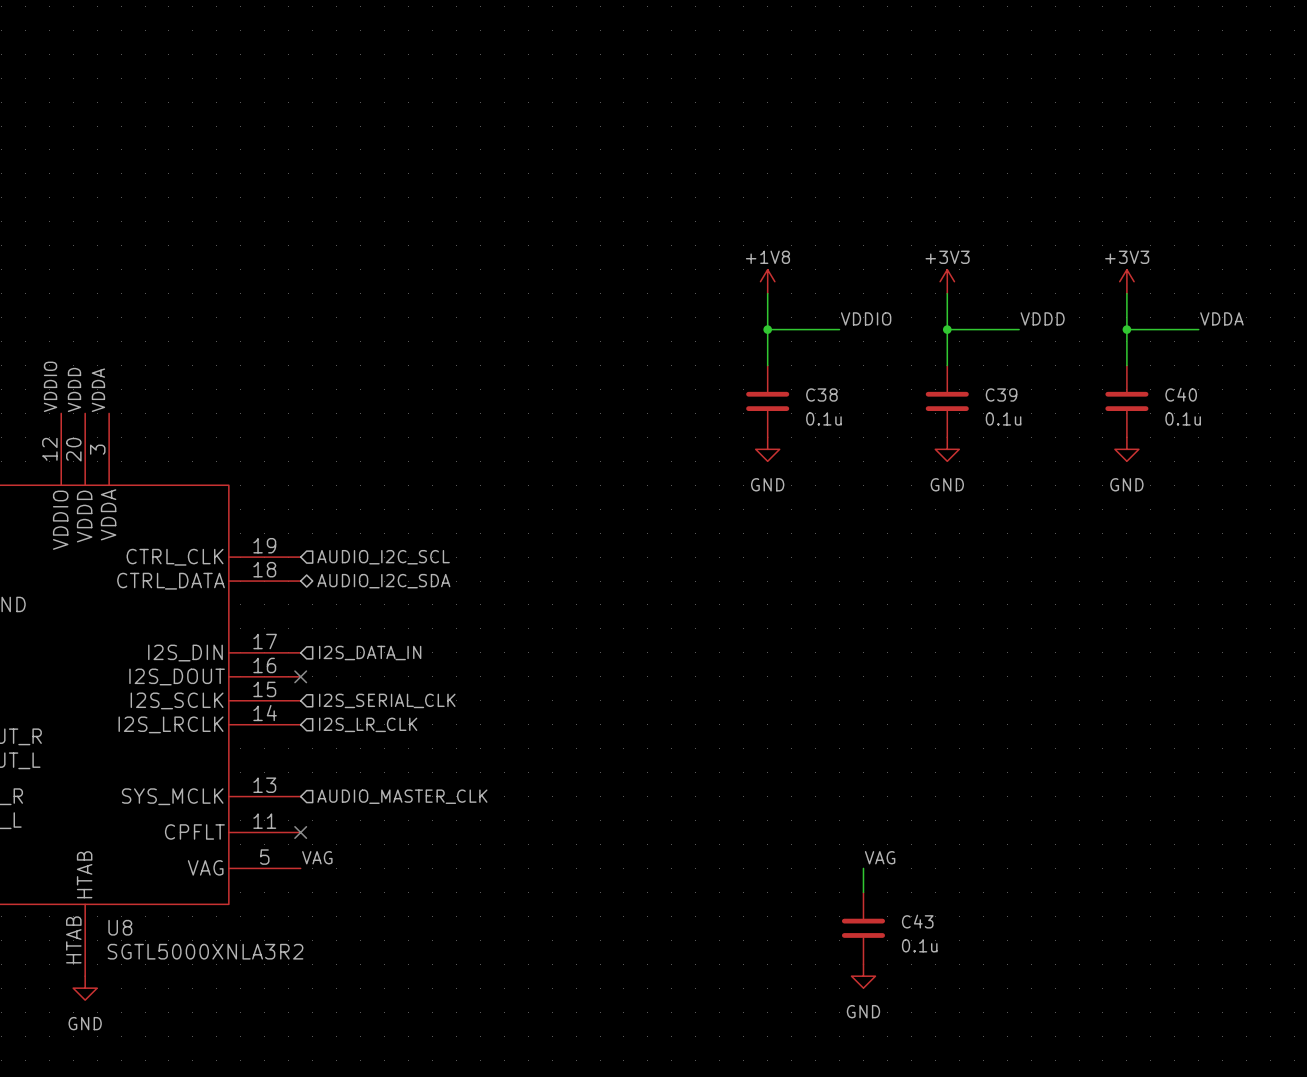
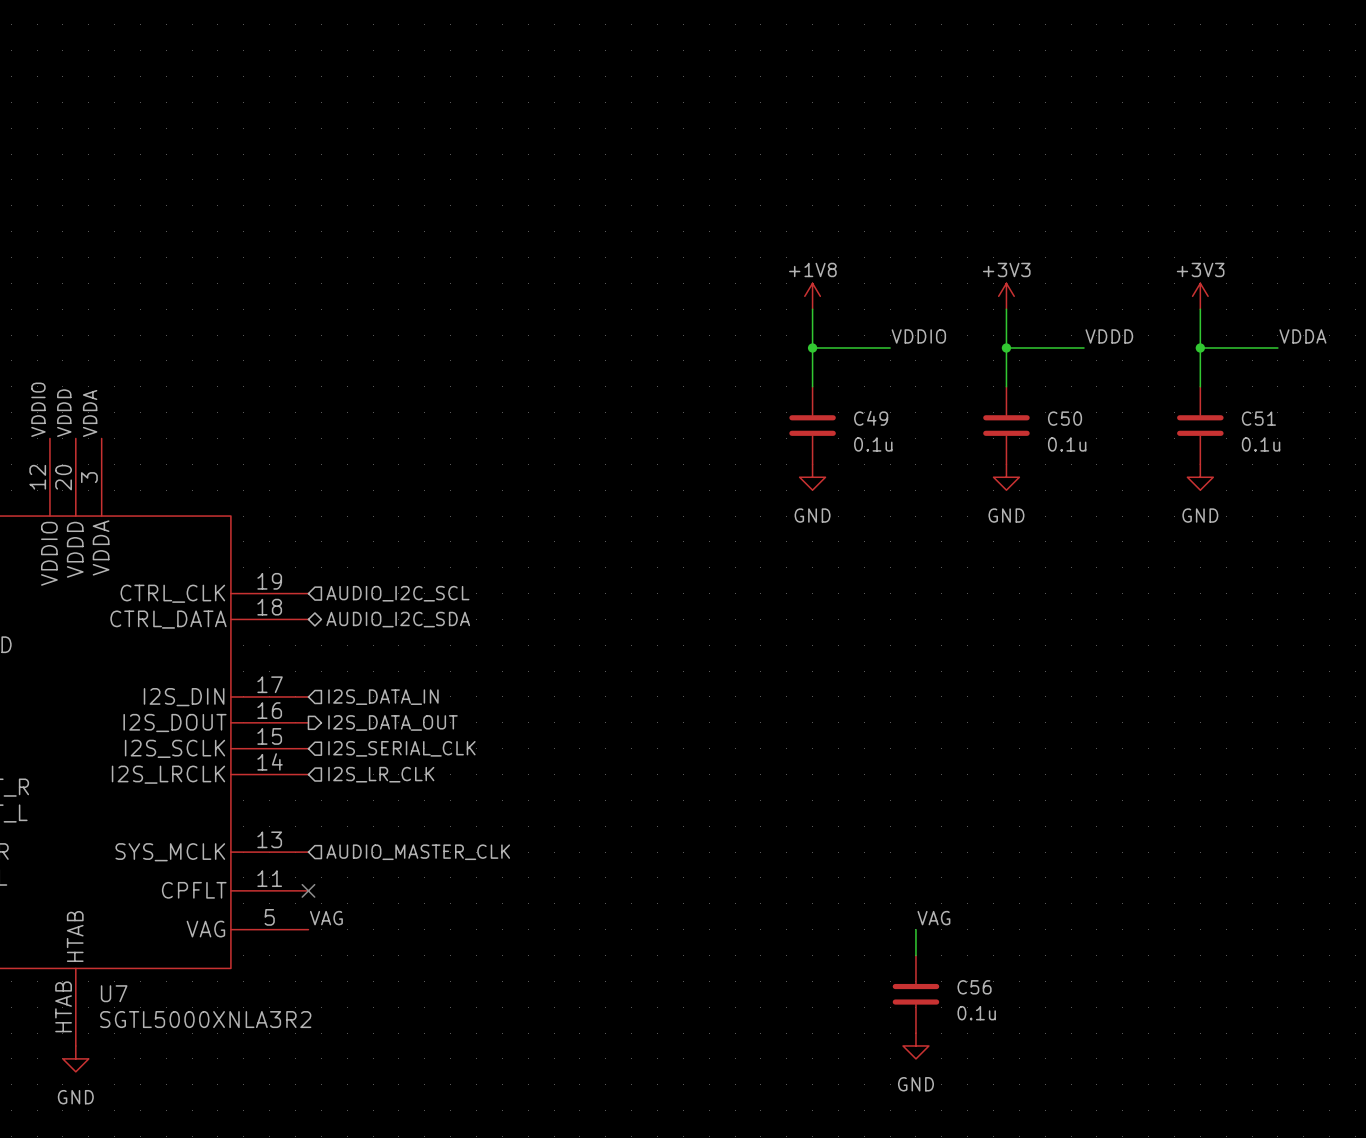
C40 name: C40 (1181, 394) -> C51 (1258, 418)
C38 name: C38 (821, 395) -> C49 (871, 418)
C39 name: C39 (1001, 395) -> C50 (1065, 418)
no-connect mark: (300, 676) -> none
hierarchical label: none -> I2S_DATA_OUT (393, 722)
C43 name: C43 (917, 921) -> C56 (974, 987)
U8 name: U8 (120, 927) -> U7 (114, 993)

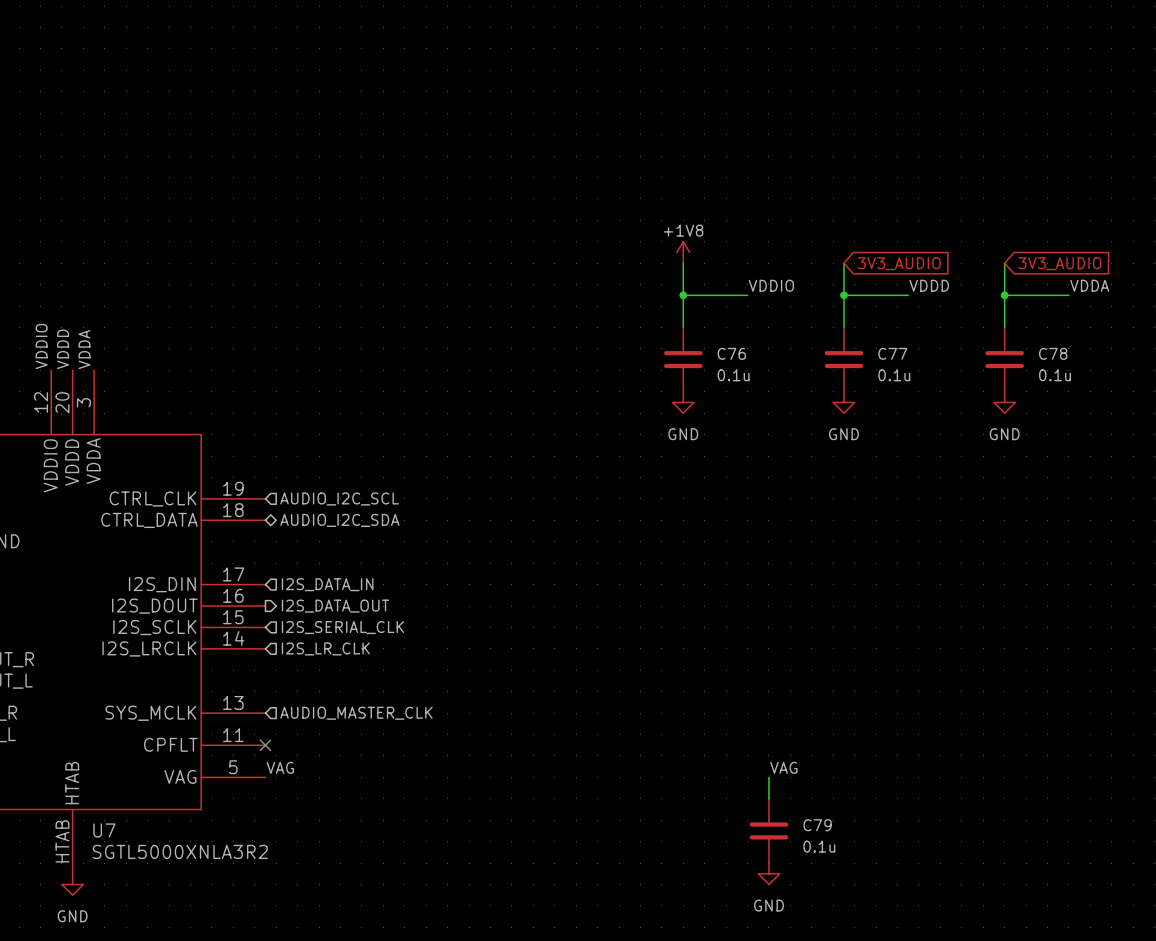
power symbol: +3V3 (1006, 296) -> none
power symbol: +3V3 (1200, 296) -> none
global label: none -> 3V3_AUDIO (899, 263)
global label: none -> 3V3_AUDIO (1059, 263)
C49 name: C49 (871, 418) -> C76 (731, 353)
C50 name: C50 (1065, 418) -> C77 (892, 353)
C51 name: C51 (1258, 418) -> C78 (1053, 353)
C56 name: C56 (974, 987) -> C79 (817, 825)

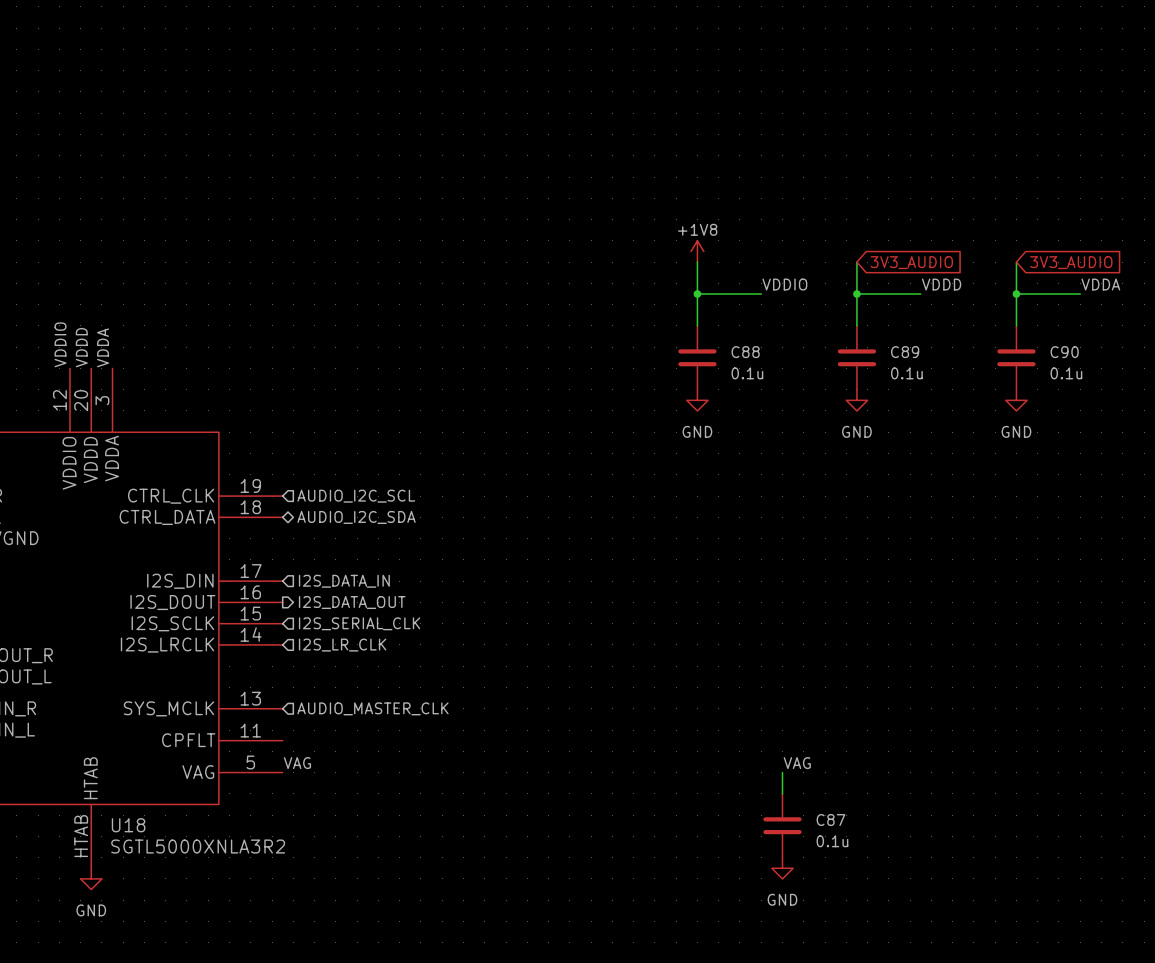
C76 name: C76 (731, 353) -> C88 (745, 352)
C77 name: C77 (892, 353) -> C89 (905, 352)
C78 name: C78 (1053, 353) -> C90 (1064, 352)
no-connect mark: (265, 745) -> none
C79 name: C79 (817, 825) -> C87 (830, 820)
U7 name: U7 (104, 830) -> U18 (128, 825)

